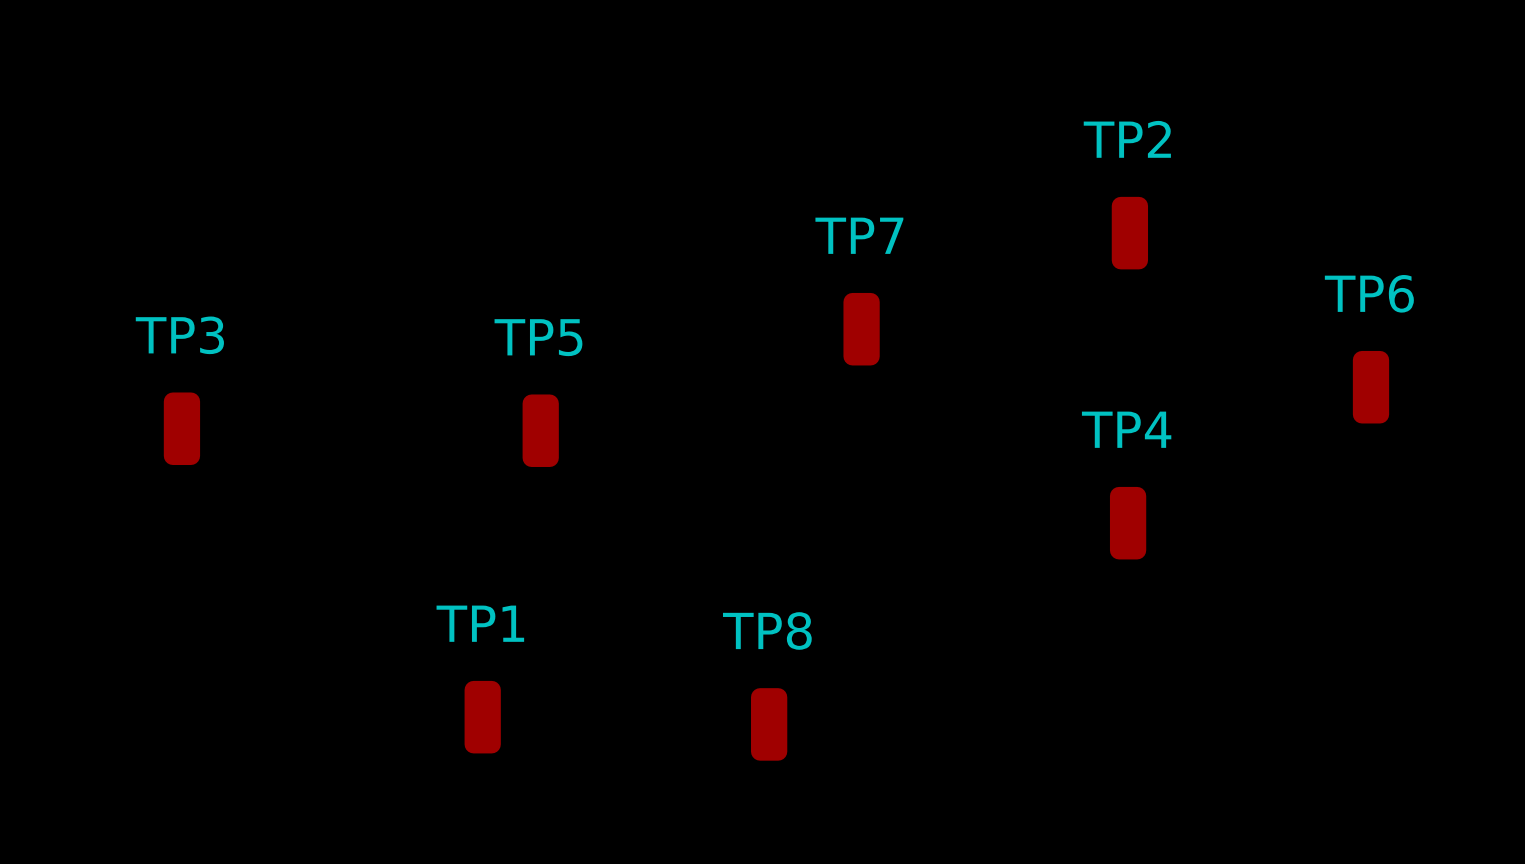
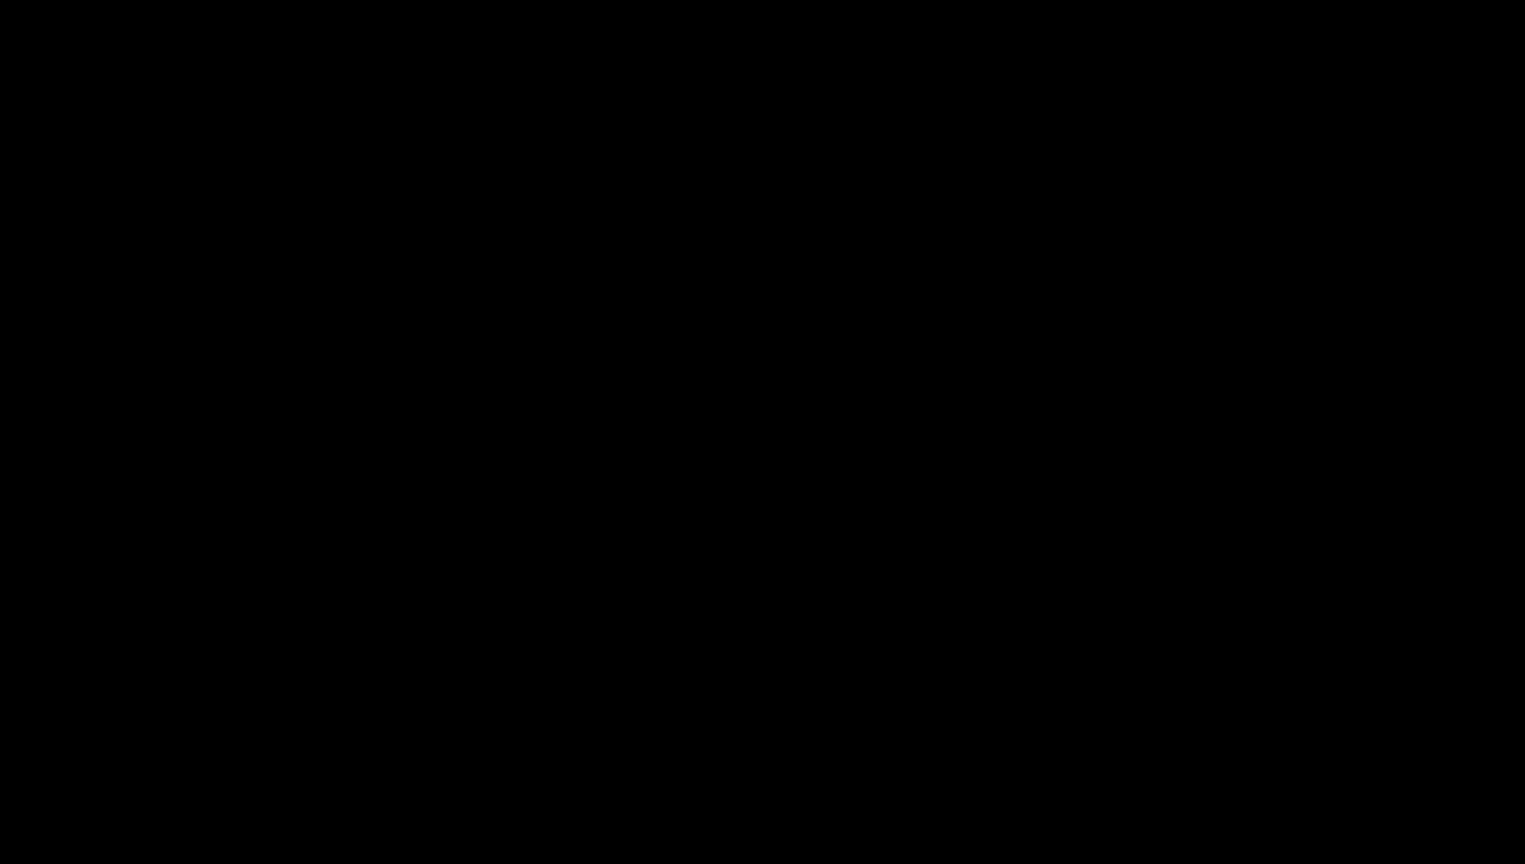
TP2: (1129, 233) -> none
TP7: (861, 329) -> none
TP6: (1371, 387) -> none
TP3: (181, 428) -> none
TP5: (540, 430) -> none
TP4: (1128, 523) -> none
TP1: (482, 717) -> none
TP8: (769, 724) -> none

